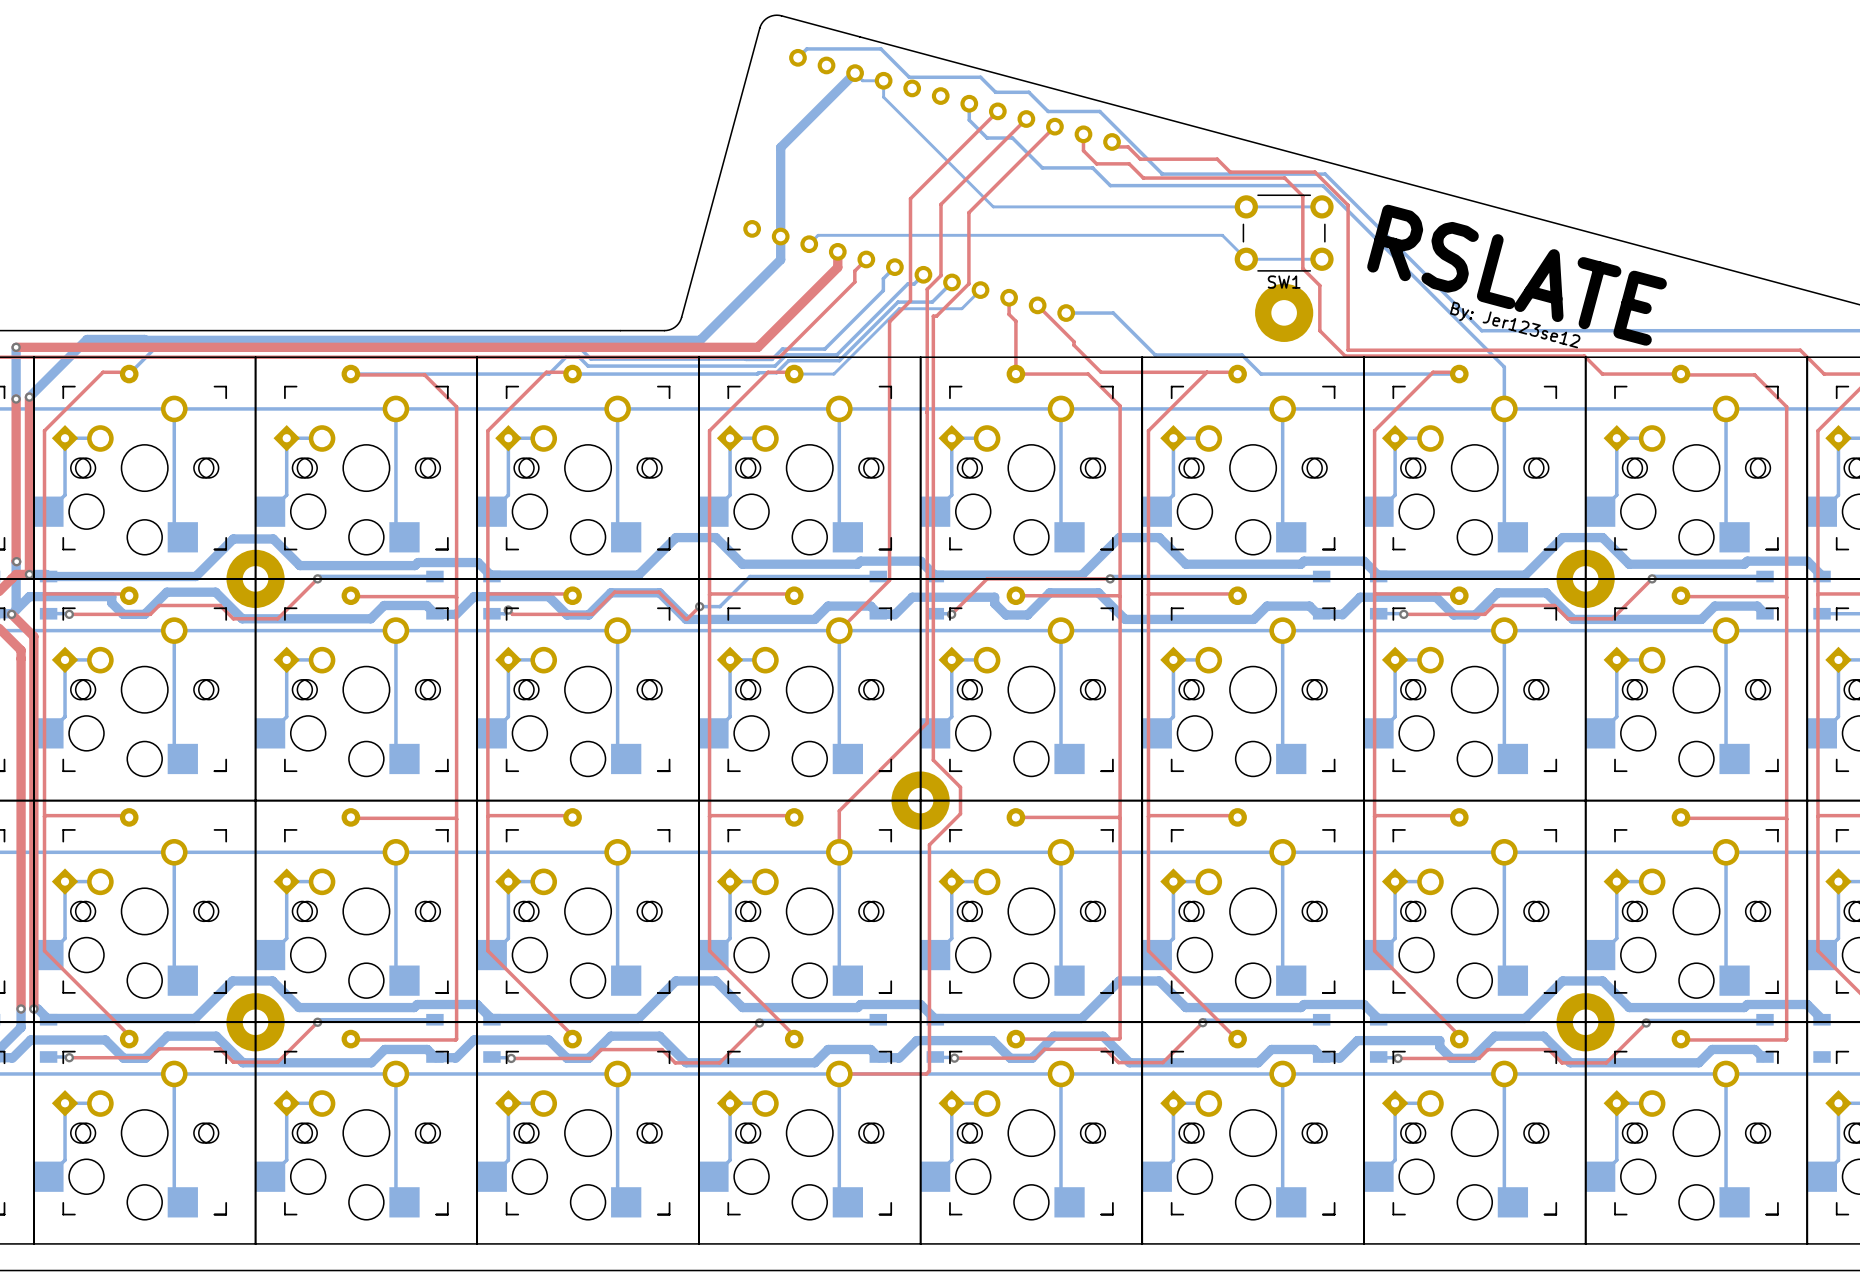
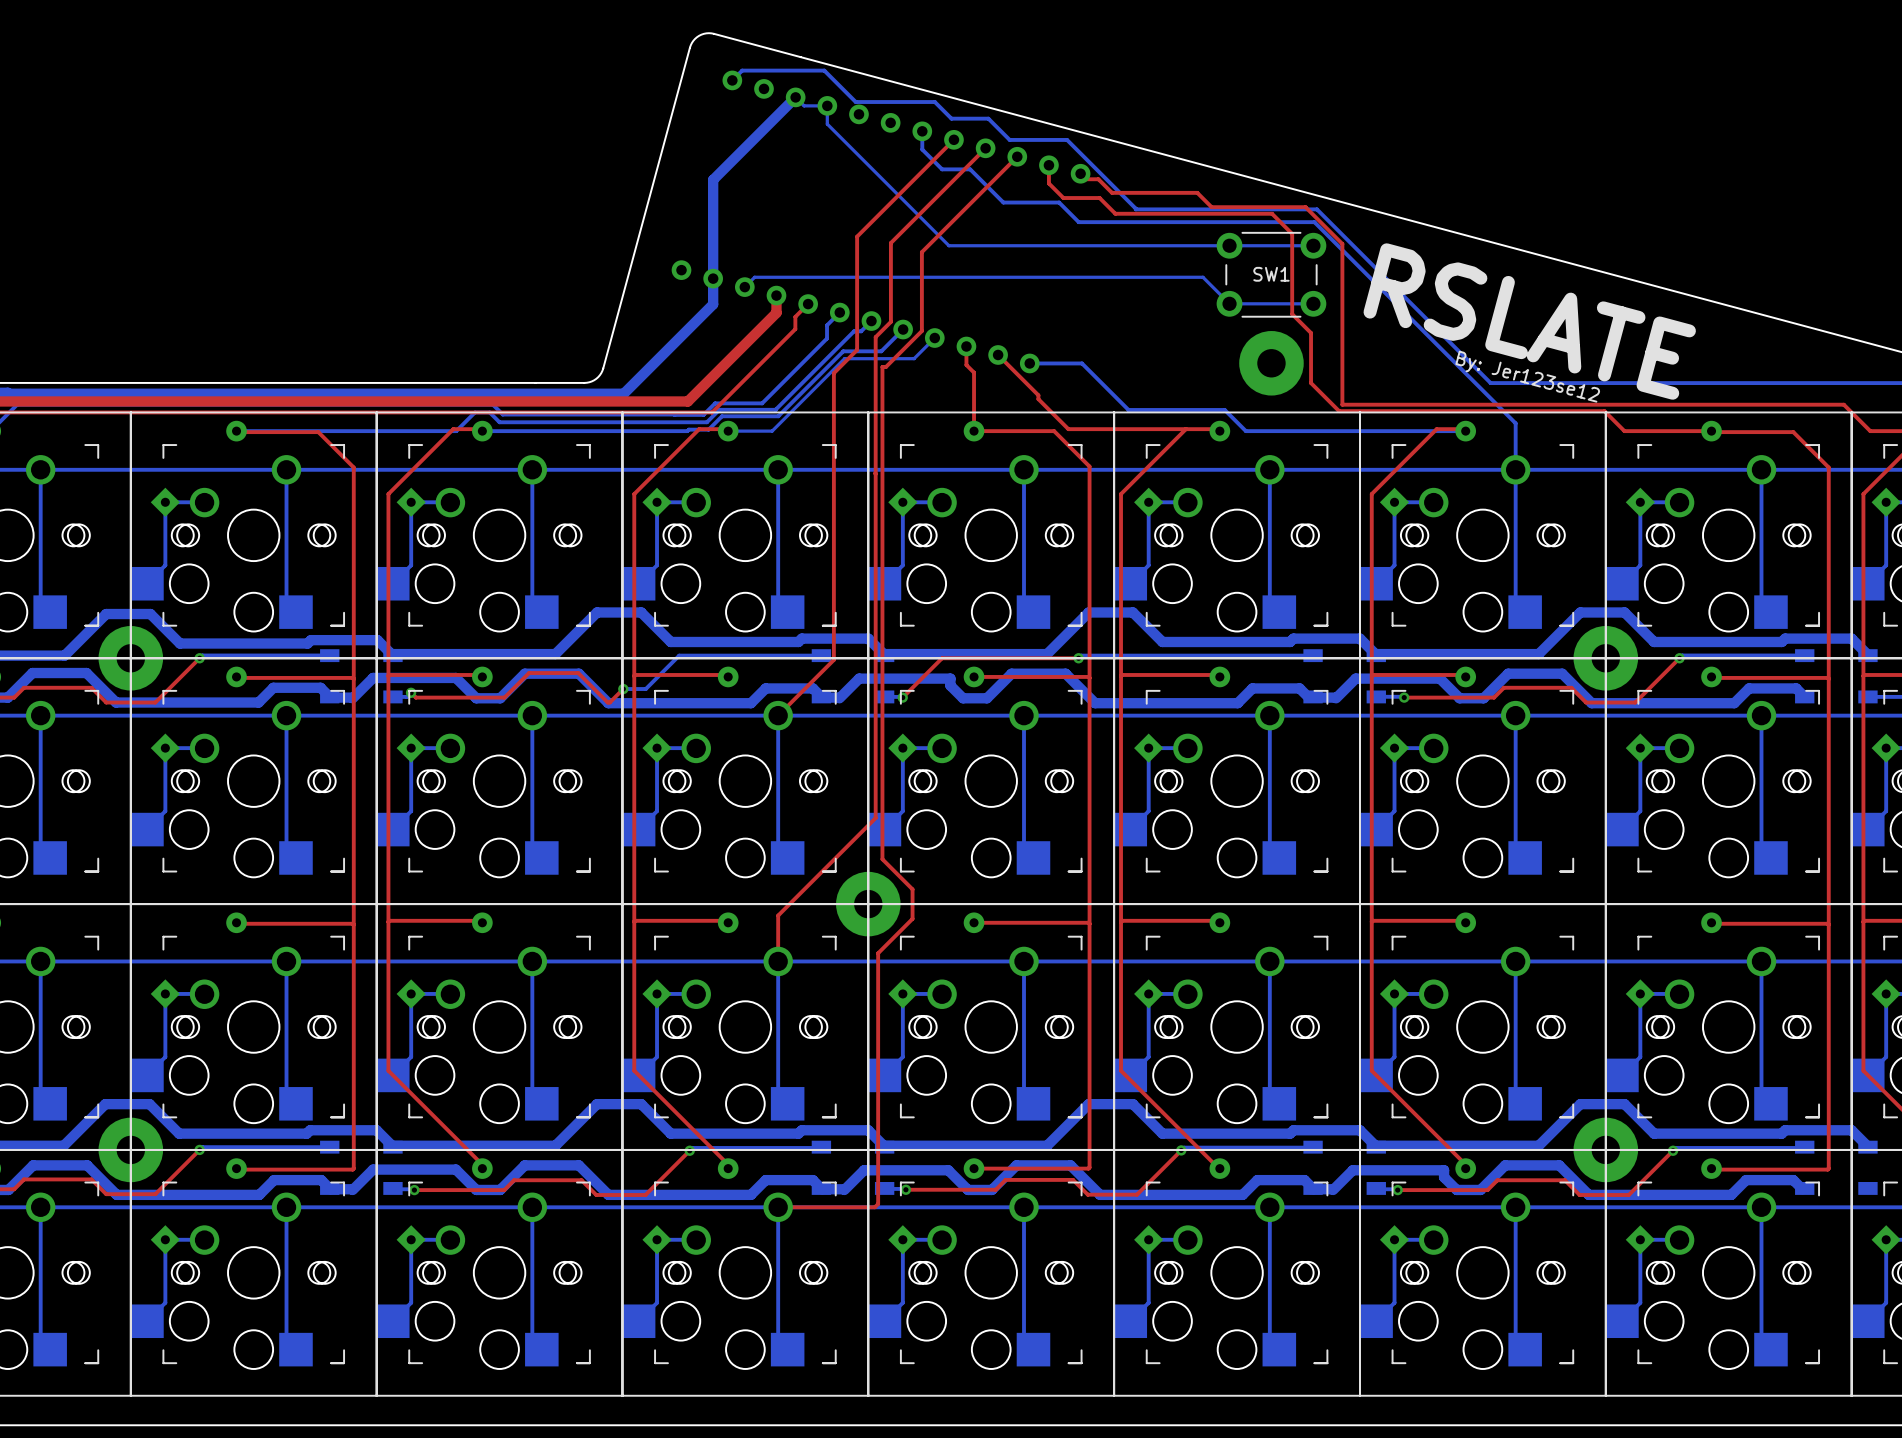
SW1 name position: SW1 (1284, 282) -> SW1 (1271, 274)

